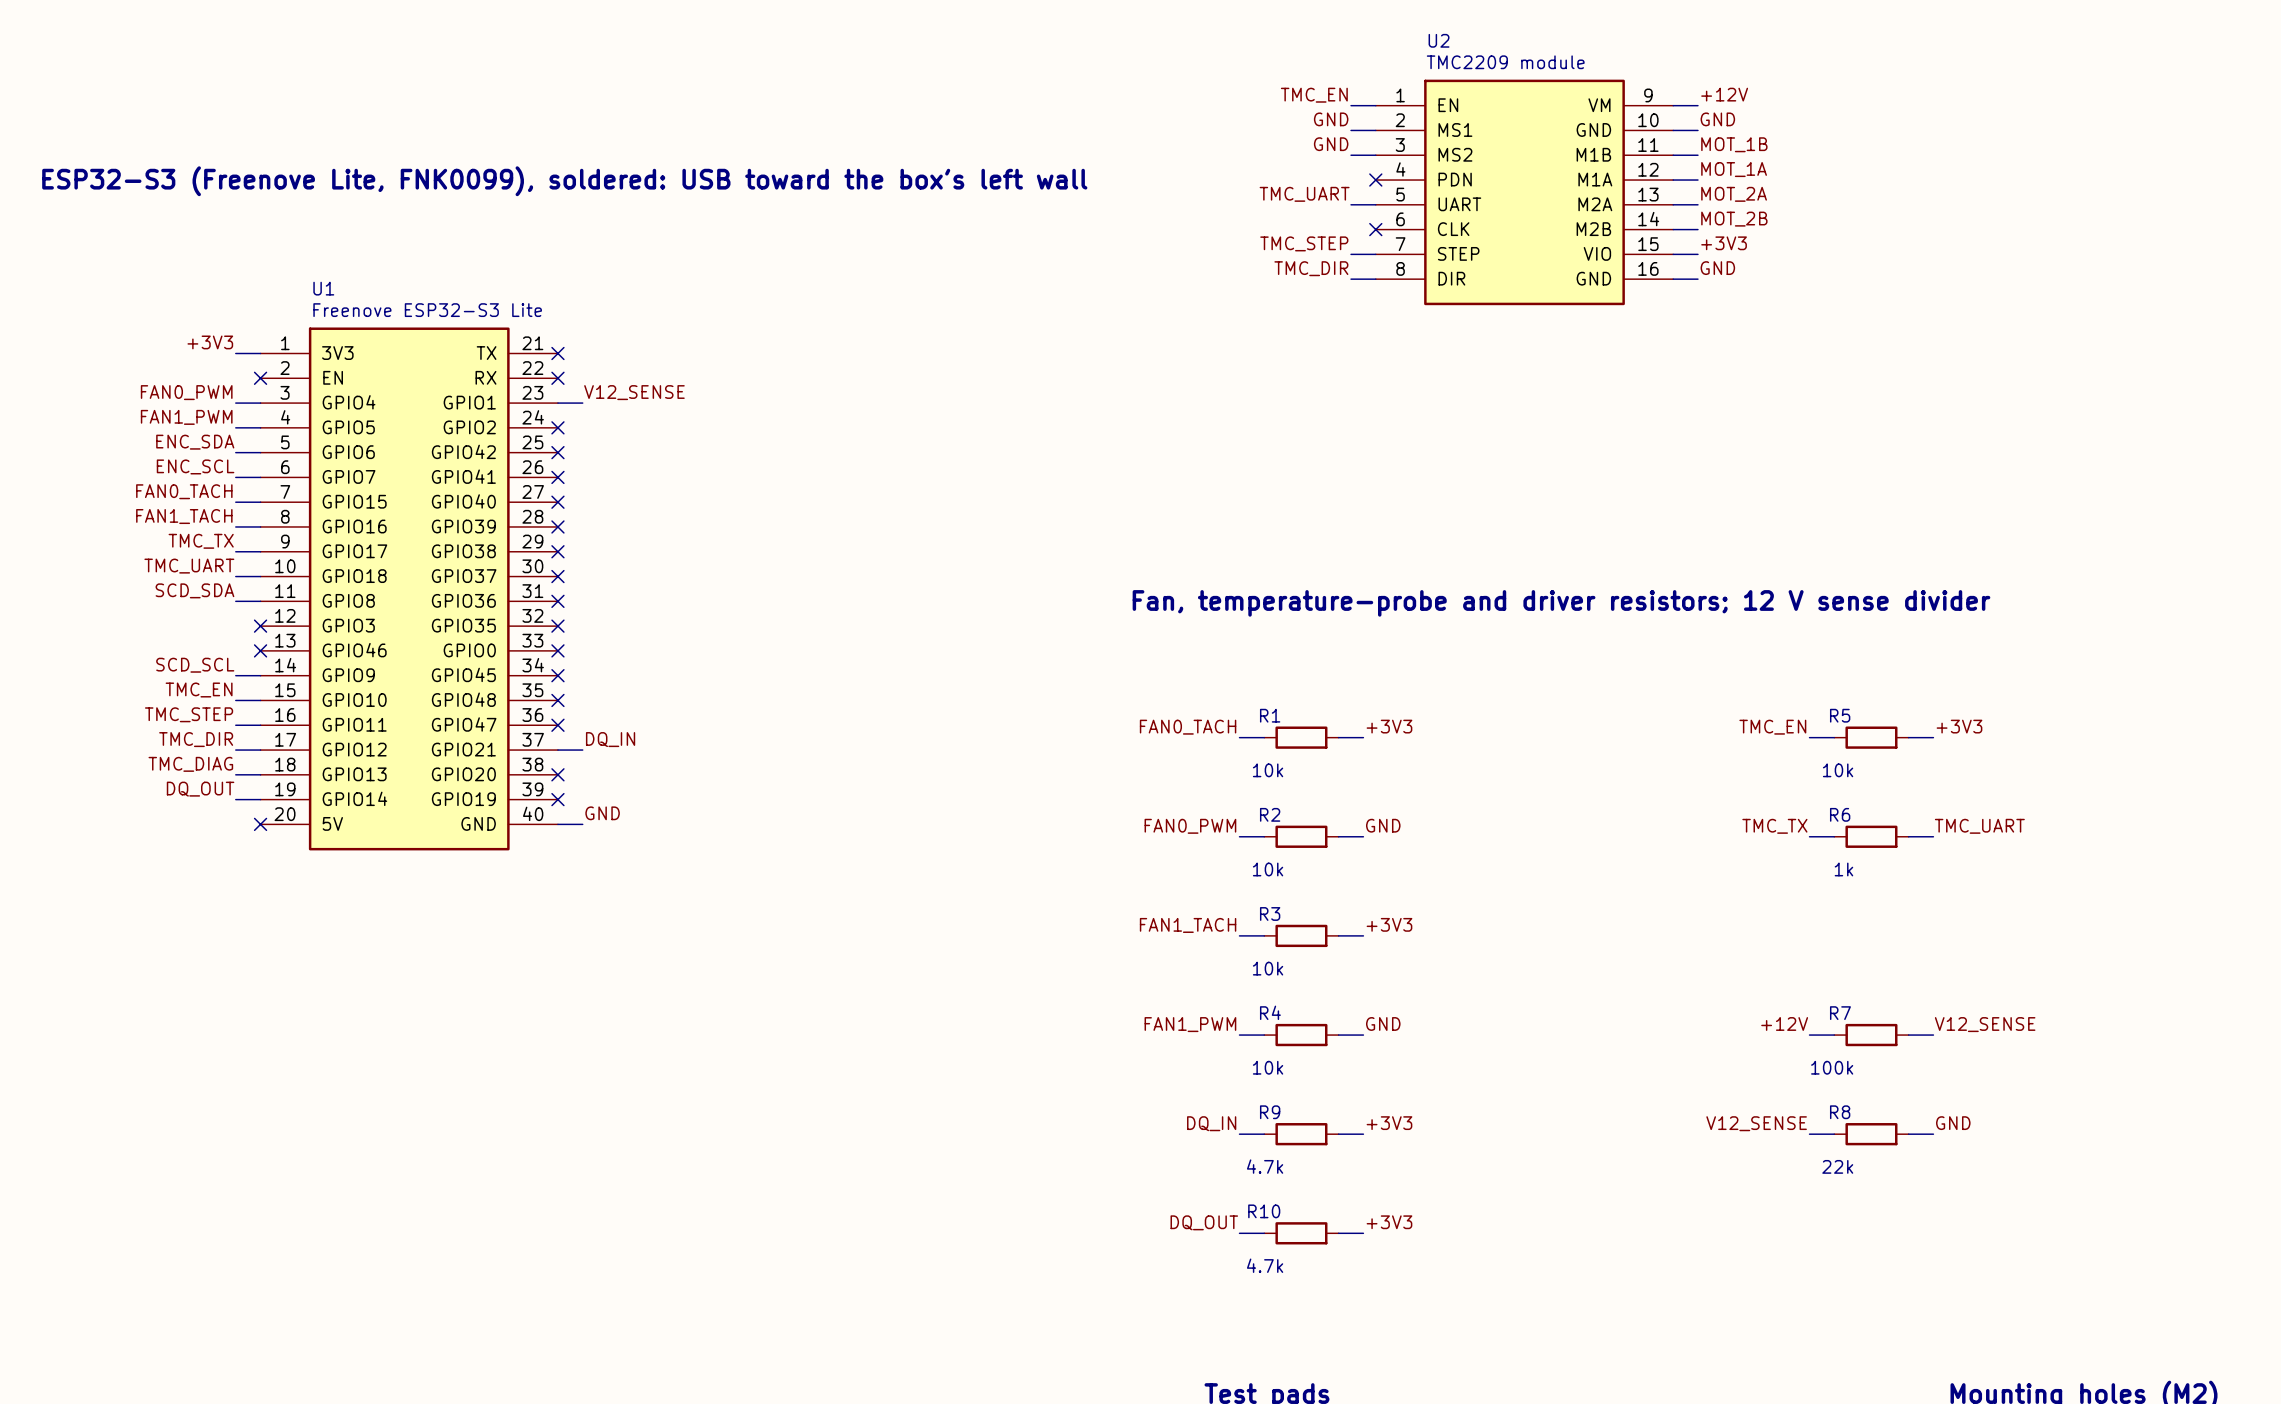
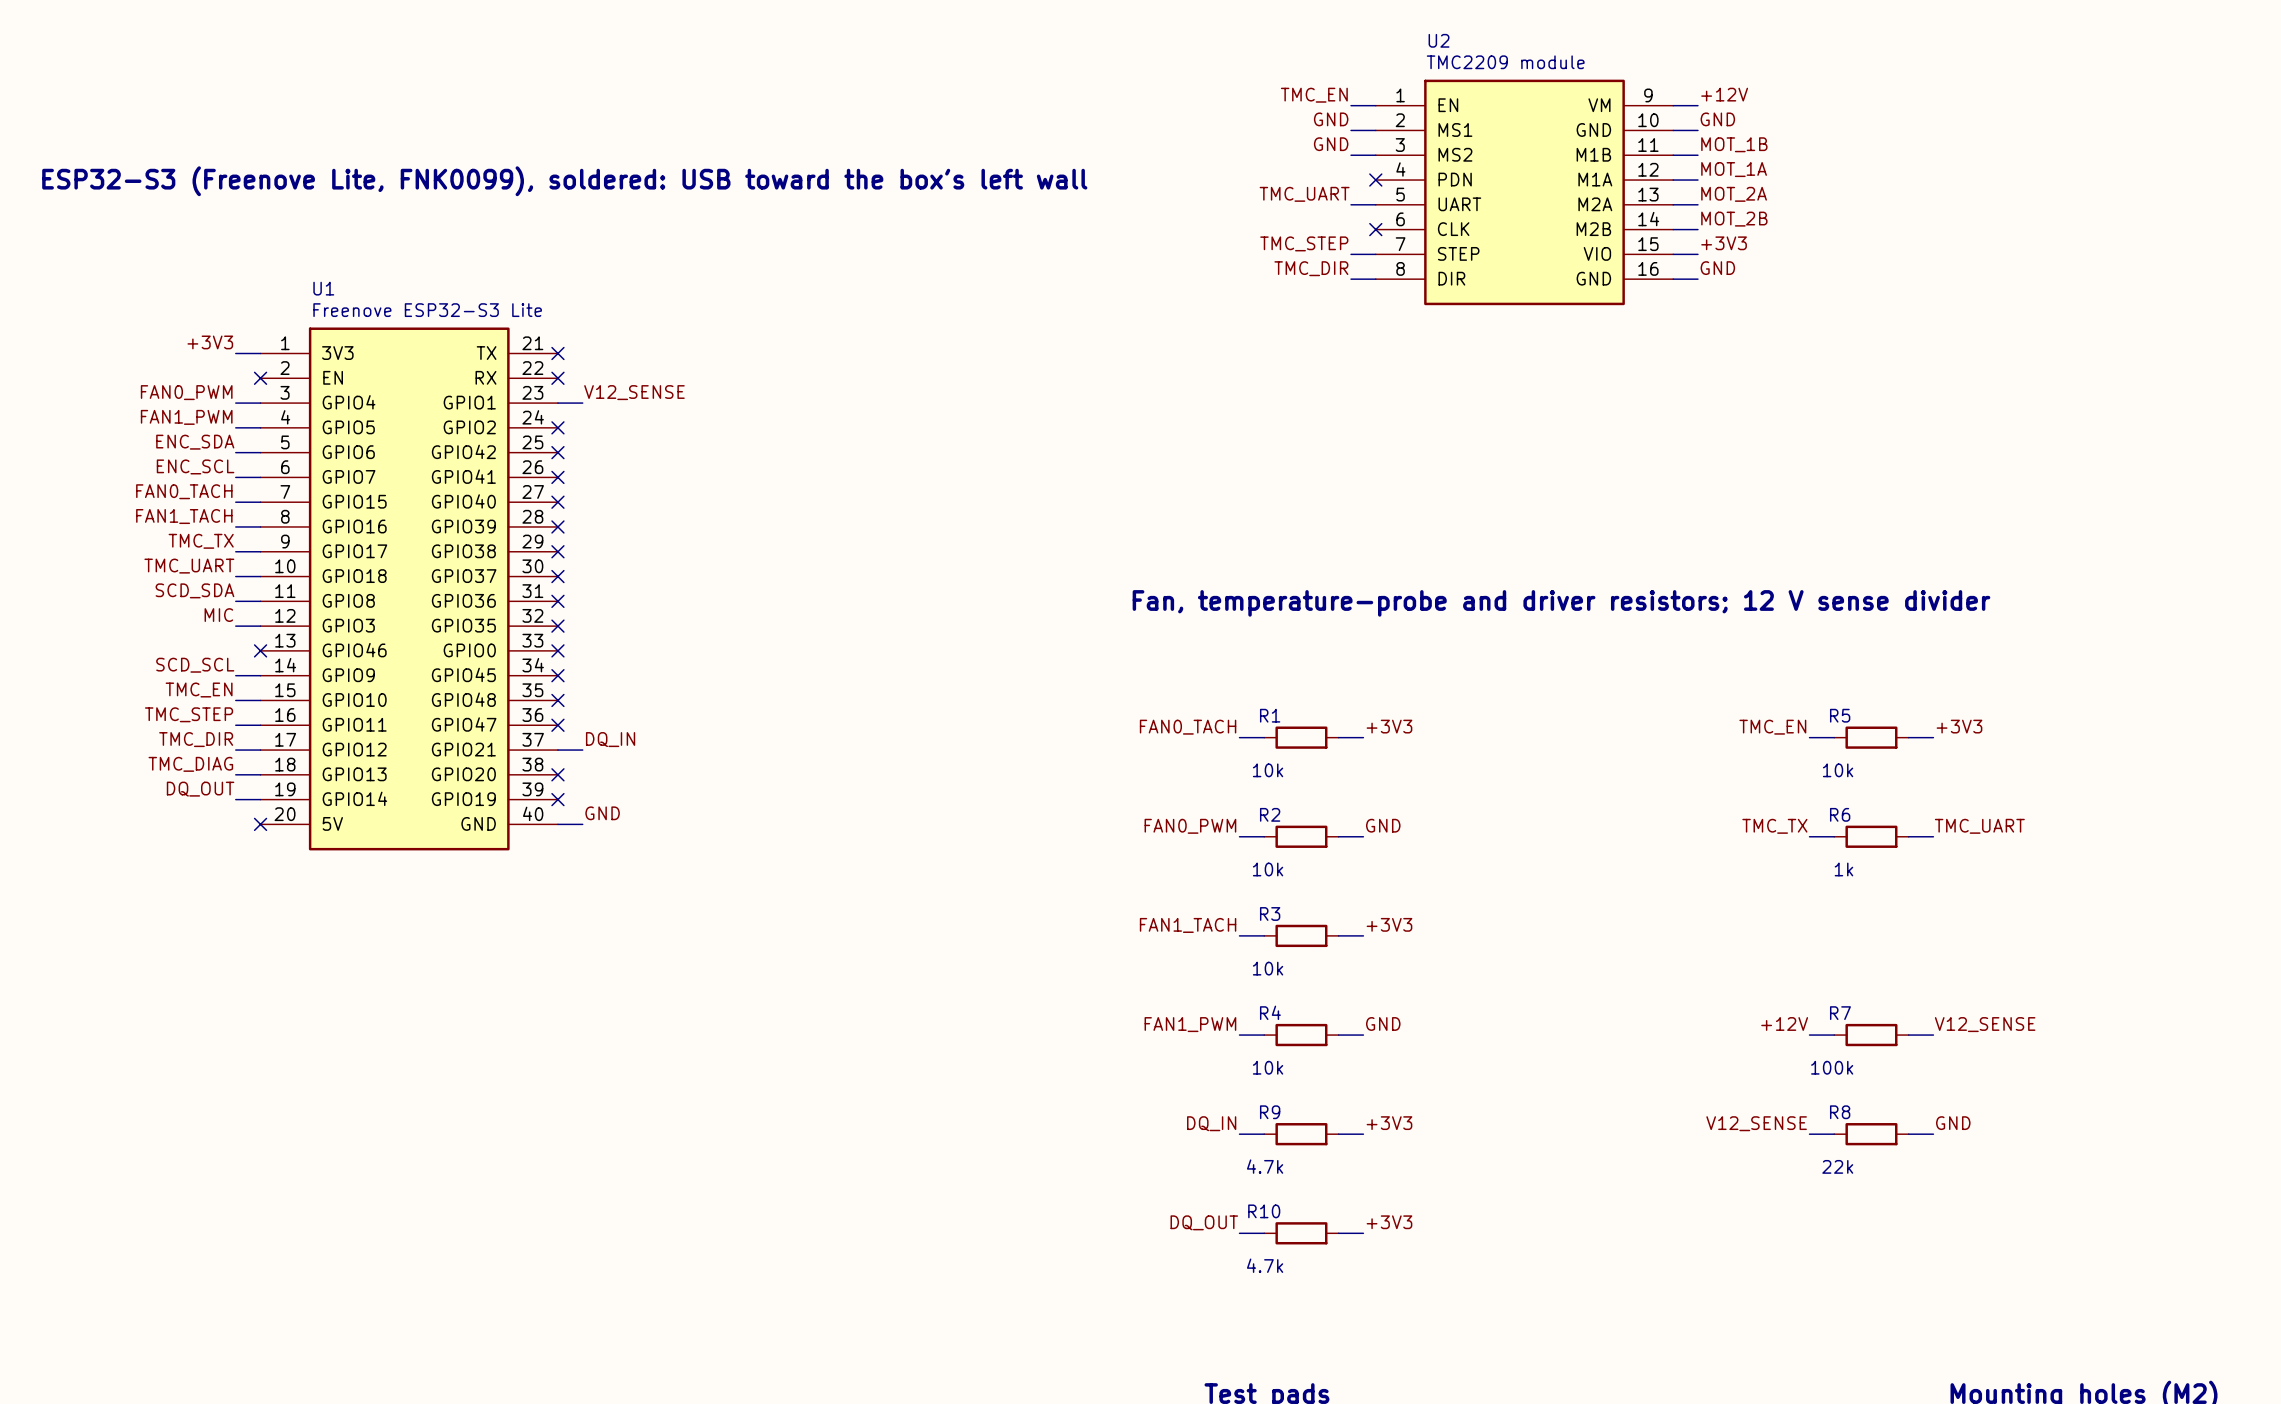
label: none -> MIC (218, 615)
wire: none -> (235, 626) (260, 626)
no-connect mark: (260, 626) -> none

